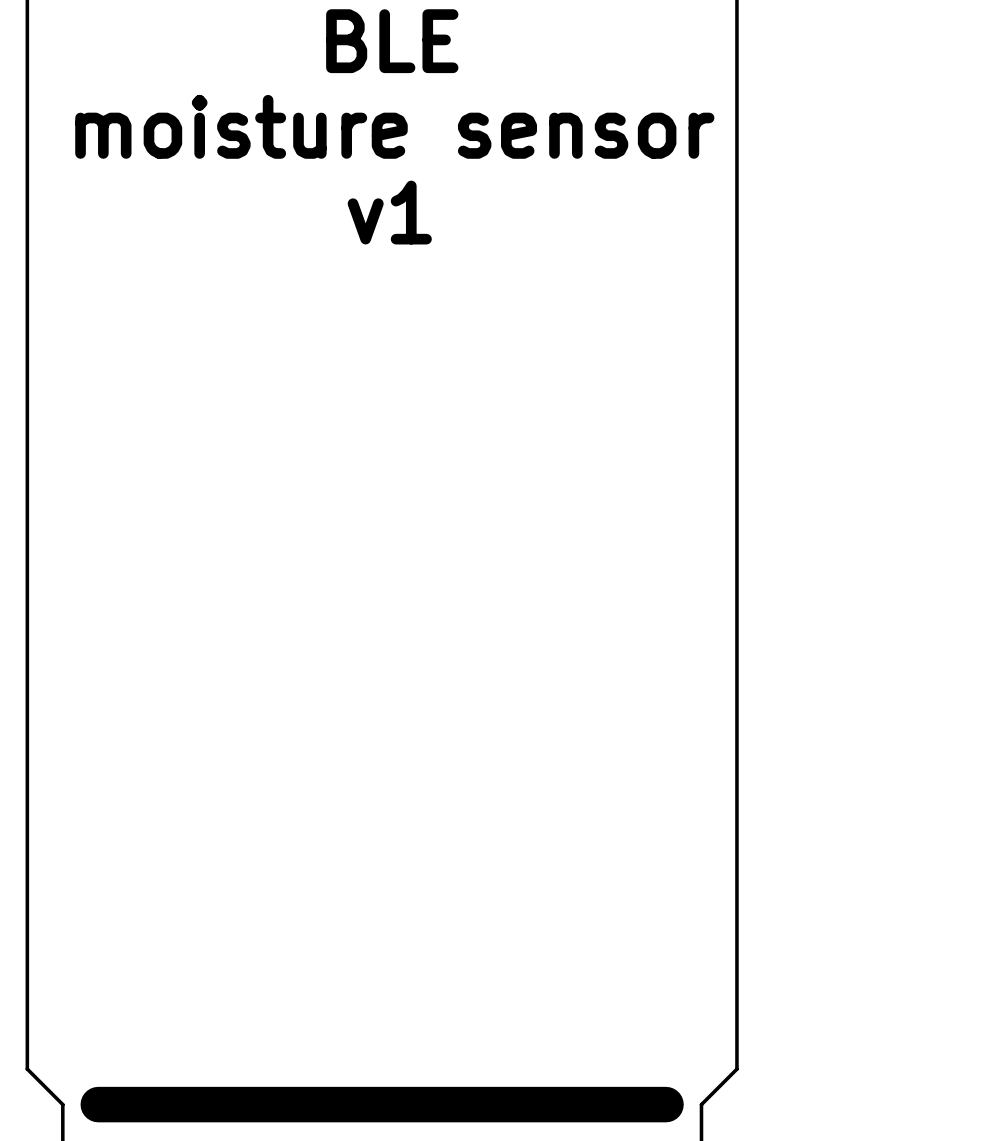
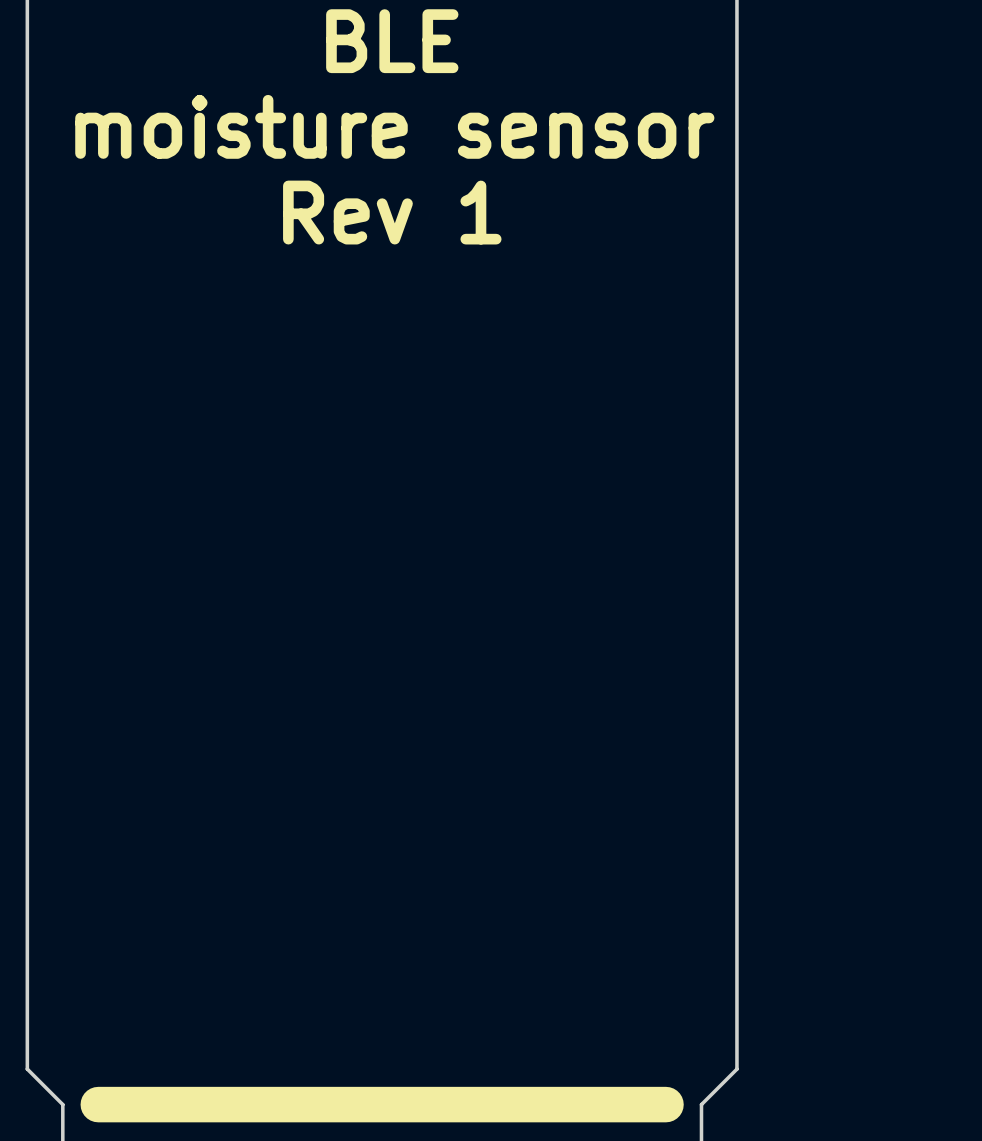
text: v1 (389, 212) -> Rev 1 (392, 212)

